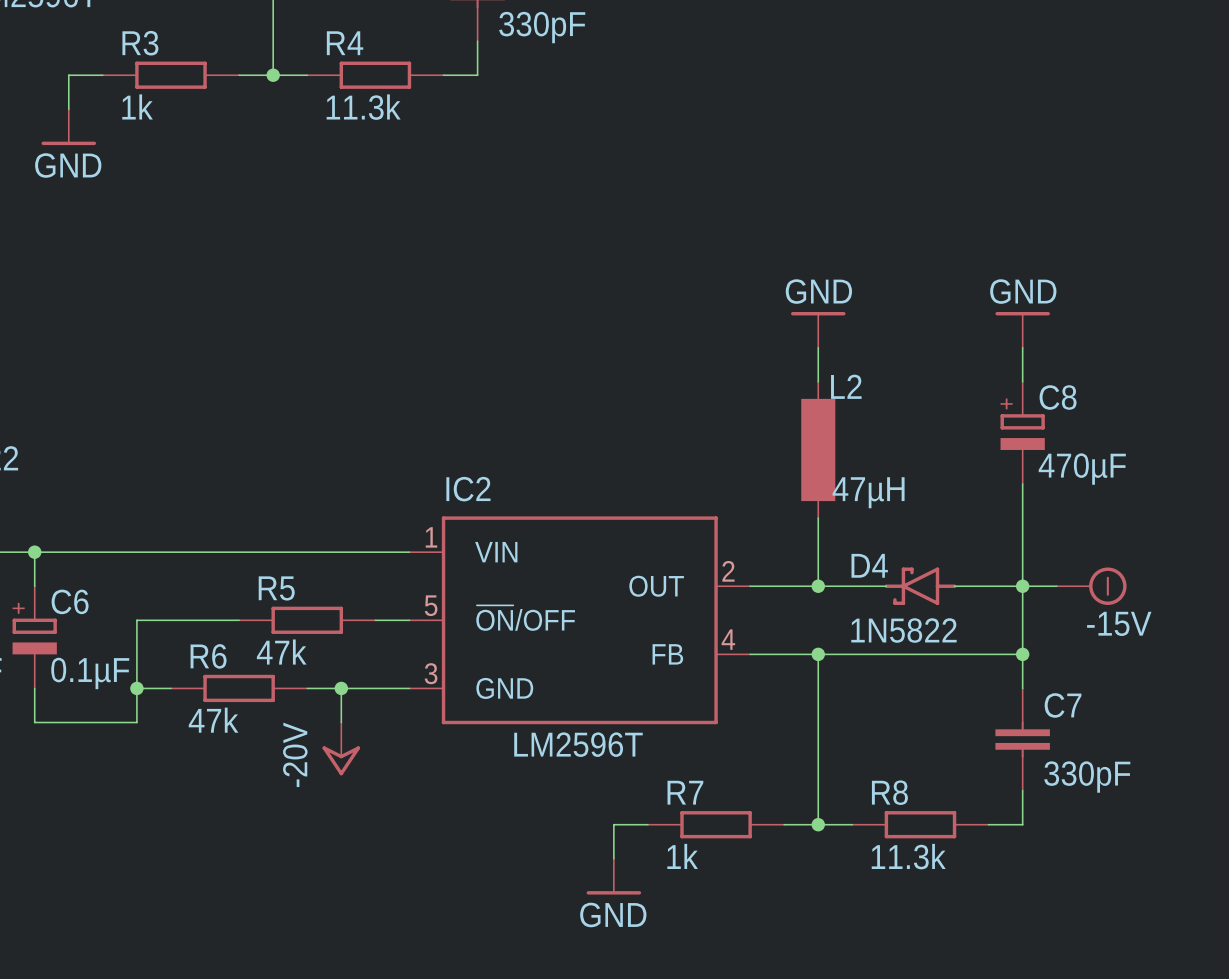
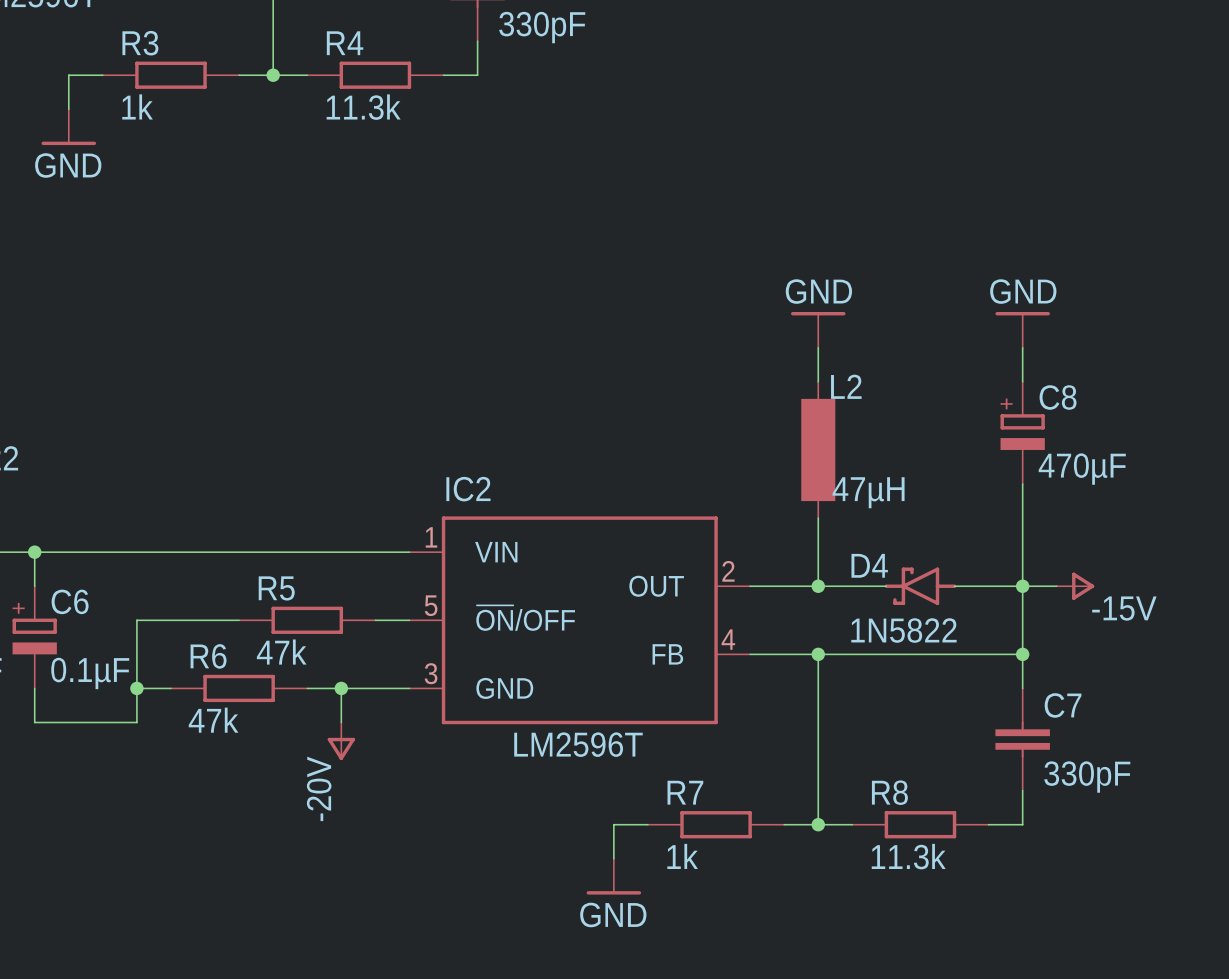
power symbol: none -> -15V (1075, 586)
power symbol: -15V (1091, 586) -> none
power symbol shape: [322, 722, 361, 776] -> [327, 722, 355, 760]
power symbol text position: -20V (295, 754) -> -20V (319, 788)

